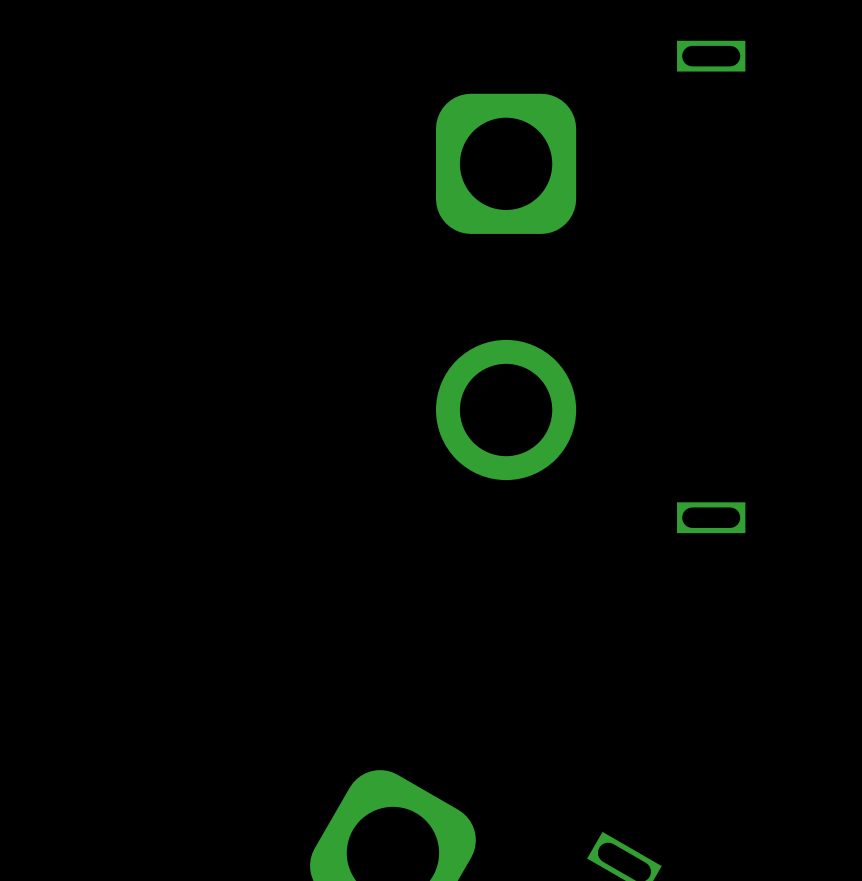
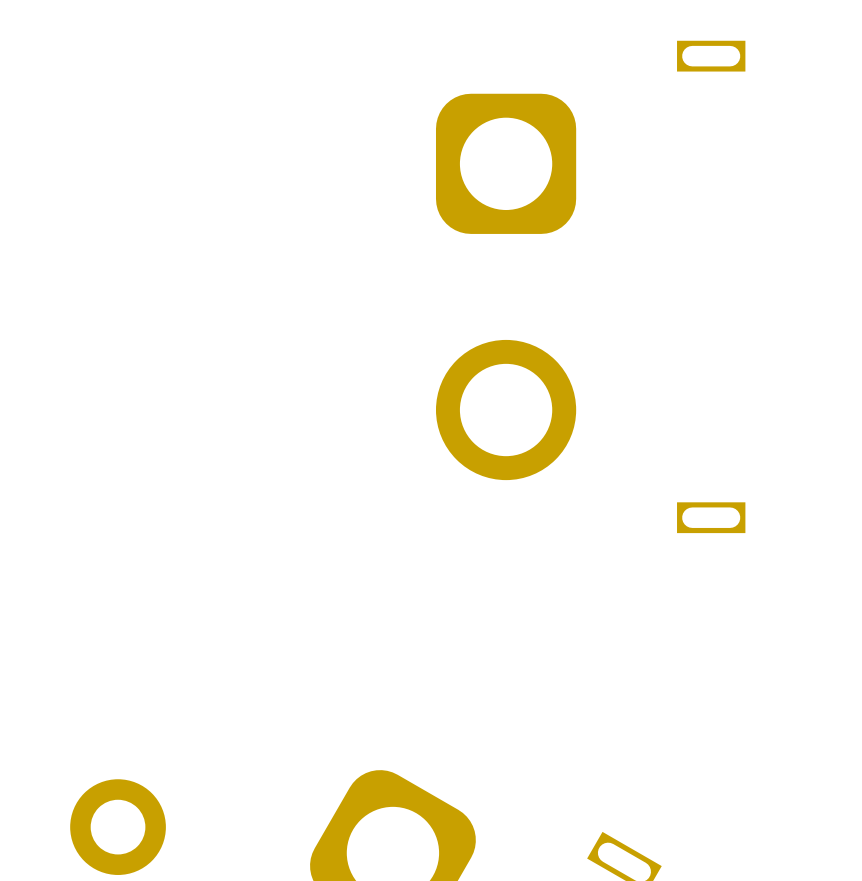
part: none -> (118, 827)

